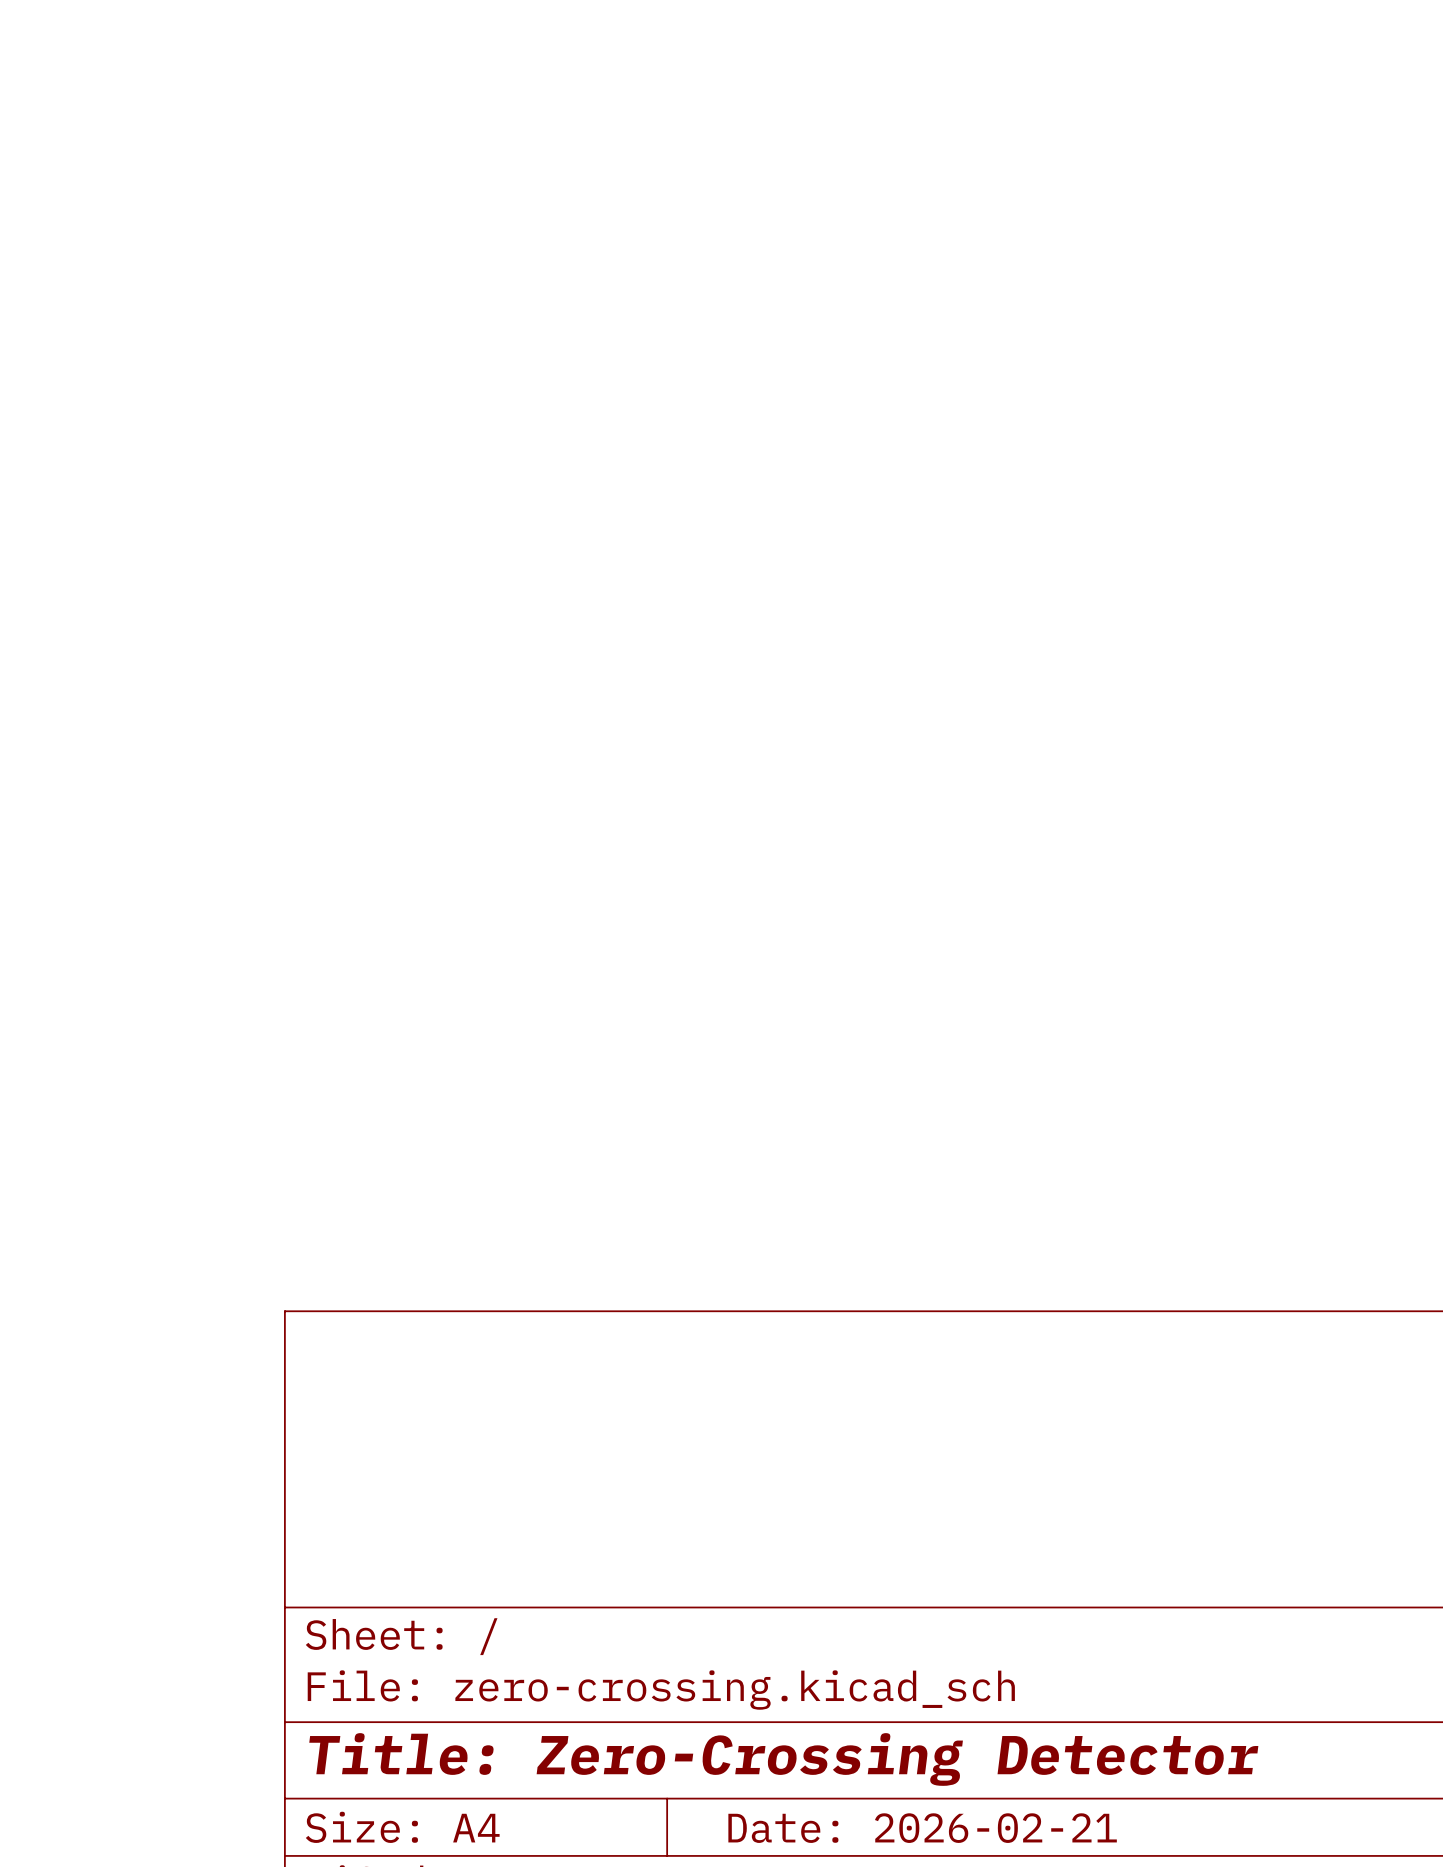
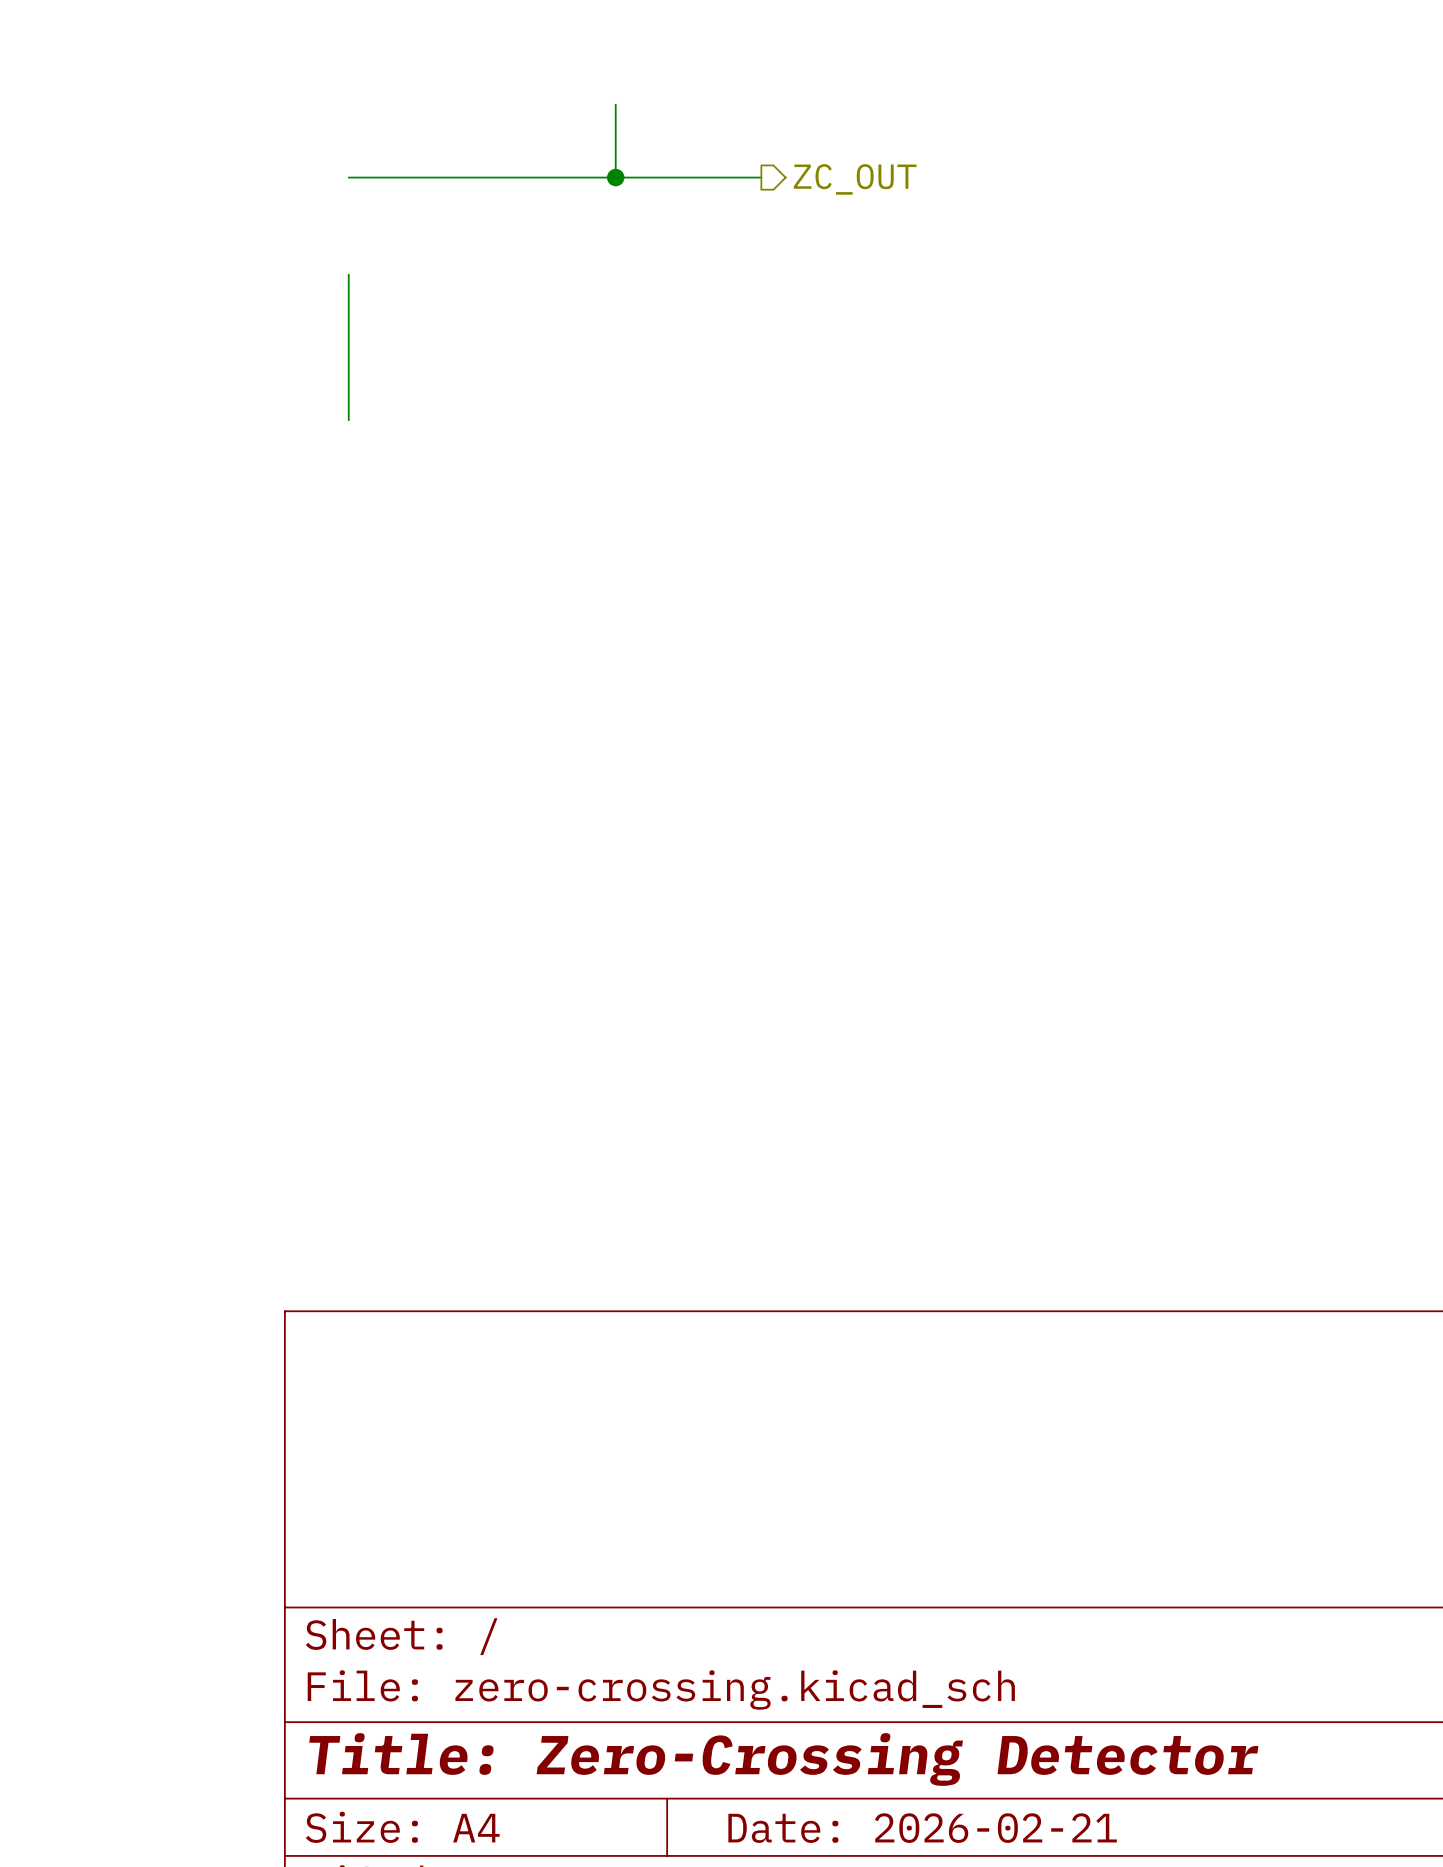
wire: none -> (615, 104) (615, 177)
wire: none -> (348, 177) (761, 177)
junction: none -> (615, 177)
hierarchical label: none -> ZC_OUT (855, 179)
wire: none -> (348, 274) (348, 420)

